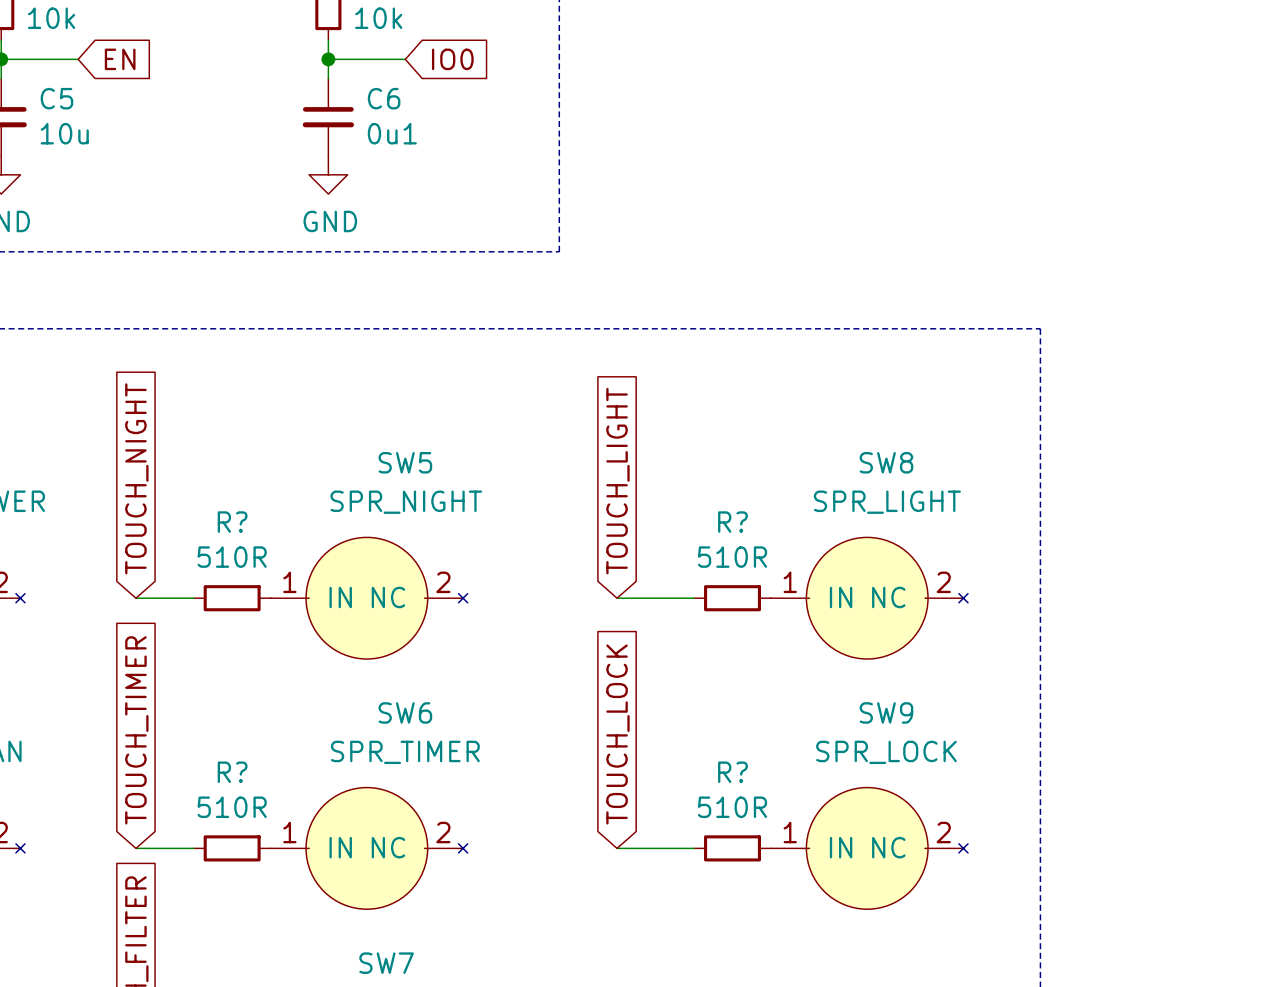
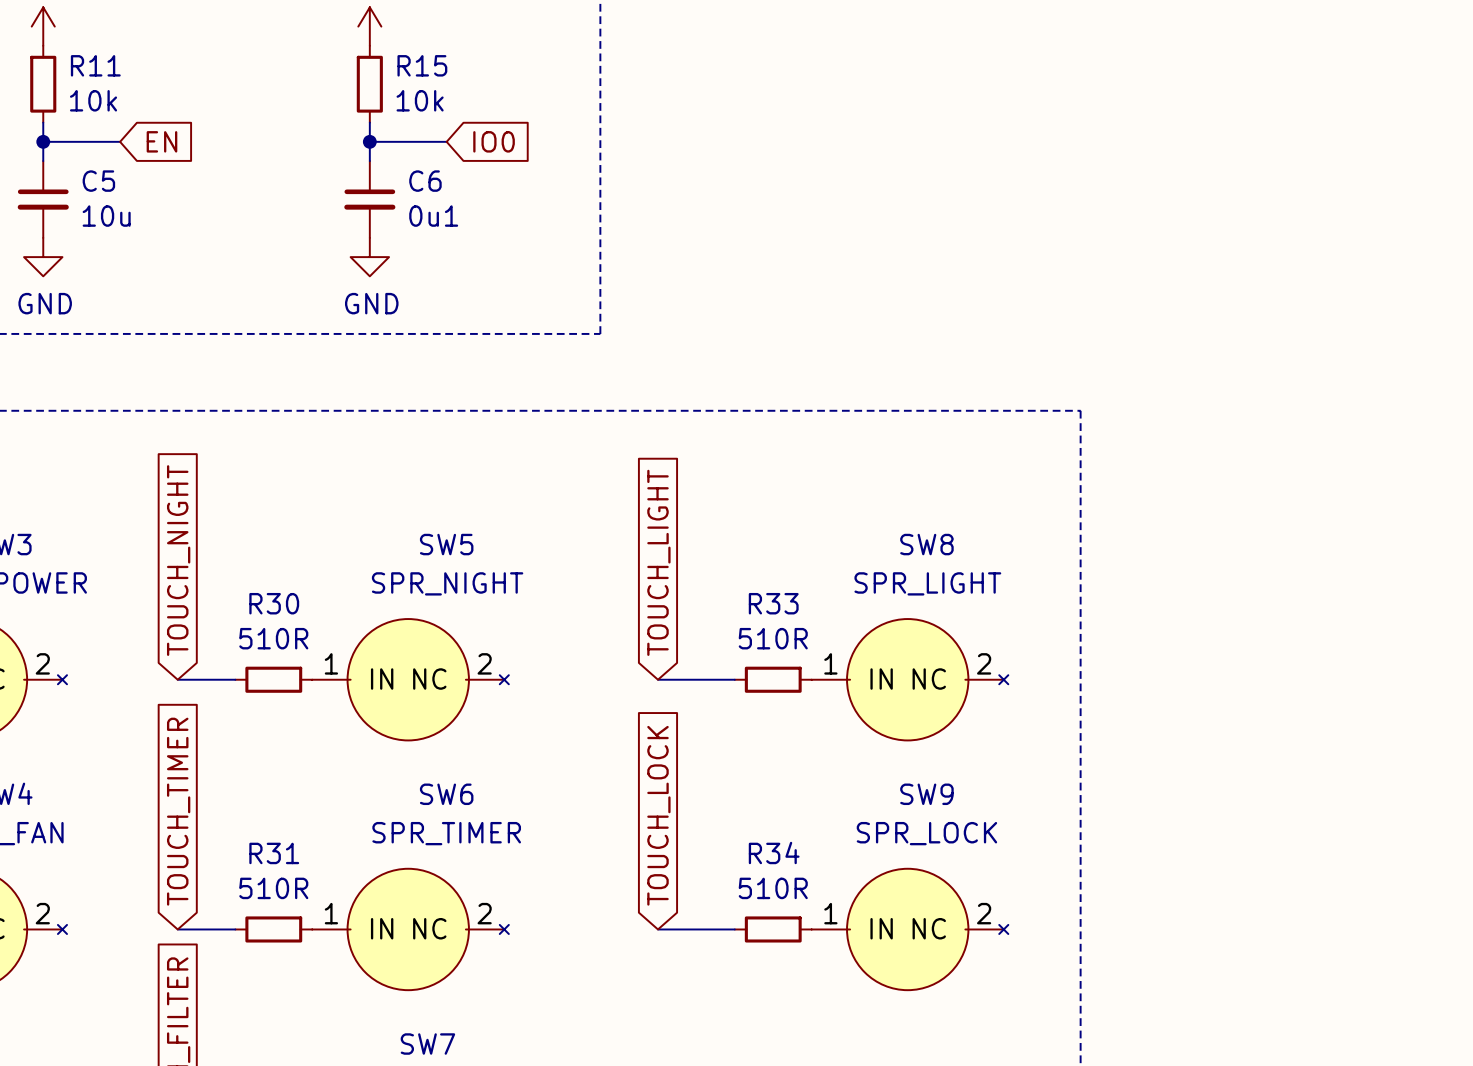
R? name: R? (232, 522) -> R30 (274, 603)
R? name: R? (732, 522) -> R33 (773, 603)
R? name: R? (232, 772) -> R31 (274, 853)
R? name: R? (732, 772) -> R34 (774, 852)

